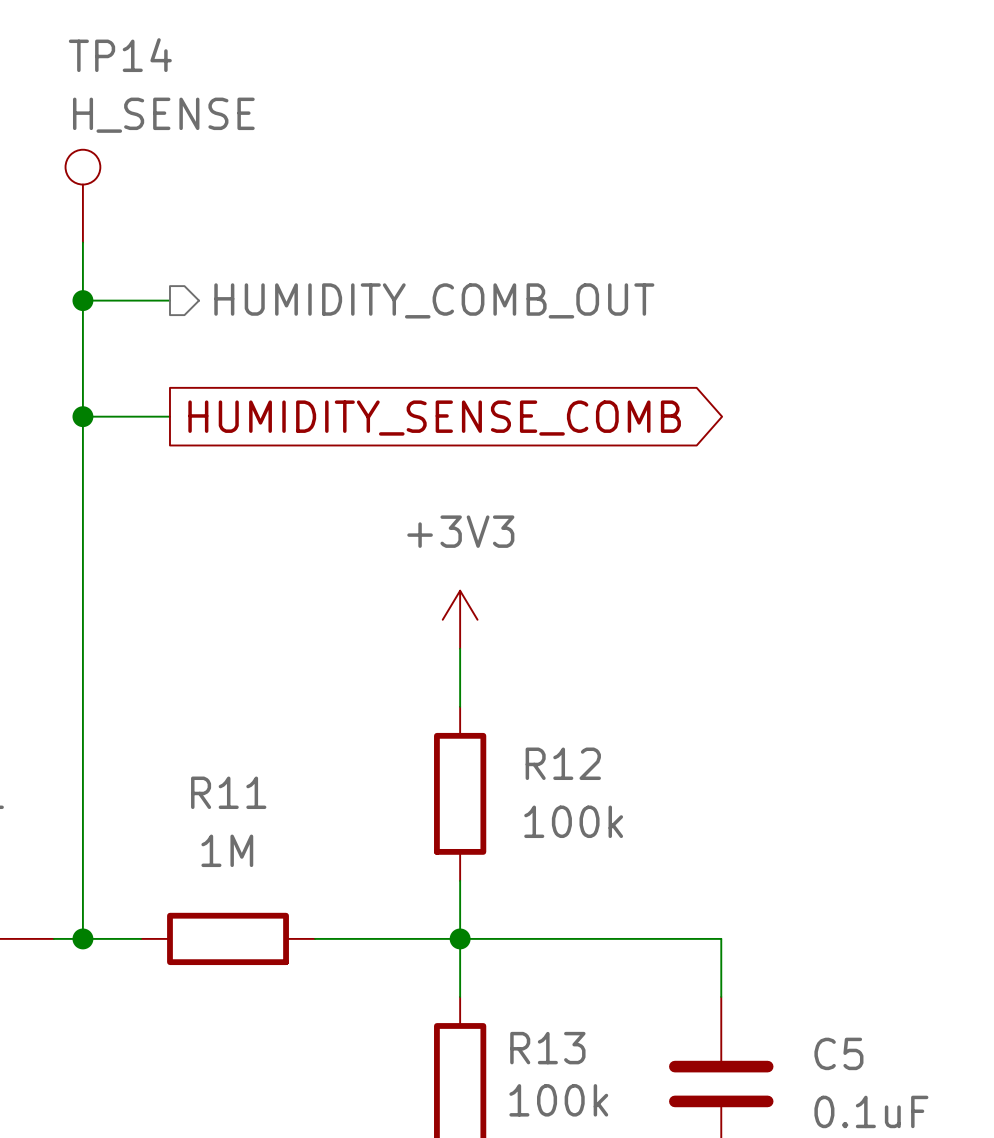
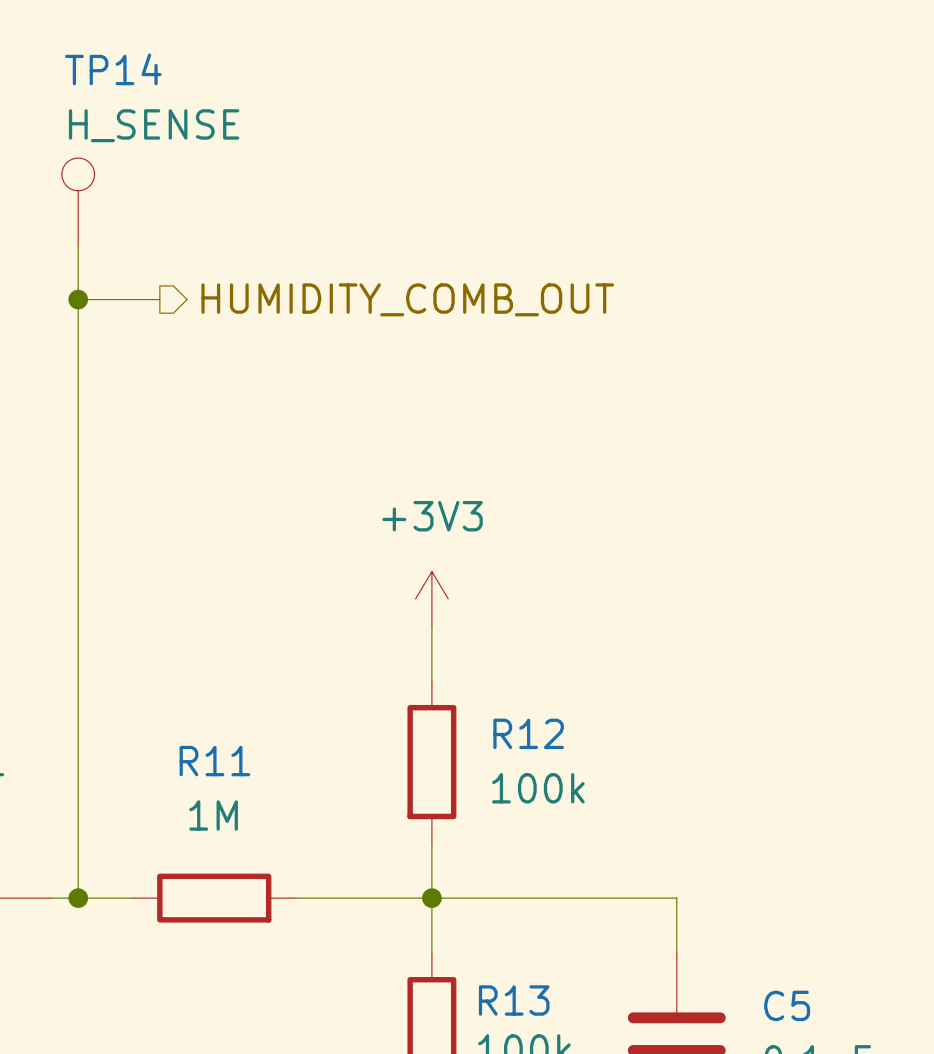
wire: (82, 416) (169, 416) -> none
junction: (82, 416) -> none
global label: HUMIDITY_SENSE_COMB (434, 418) -> none

